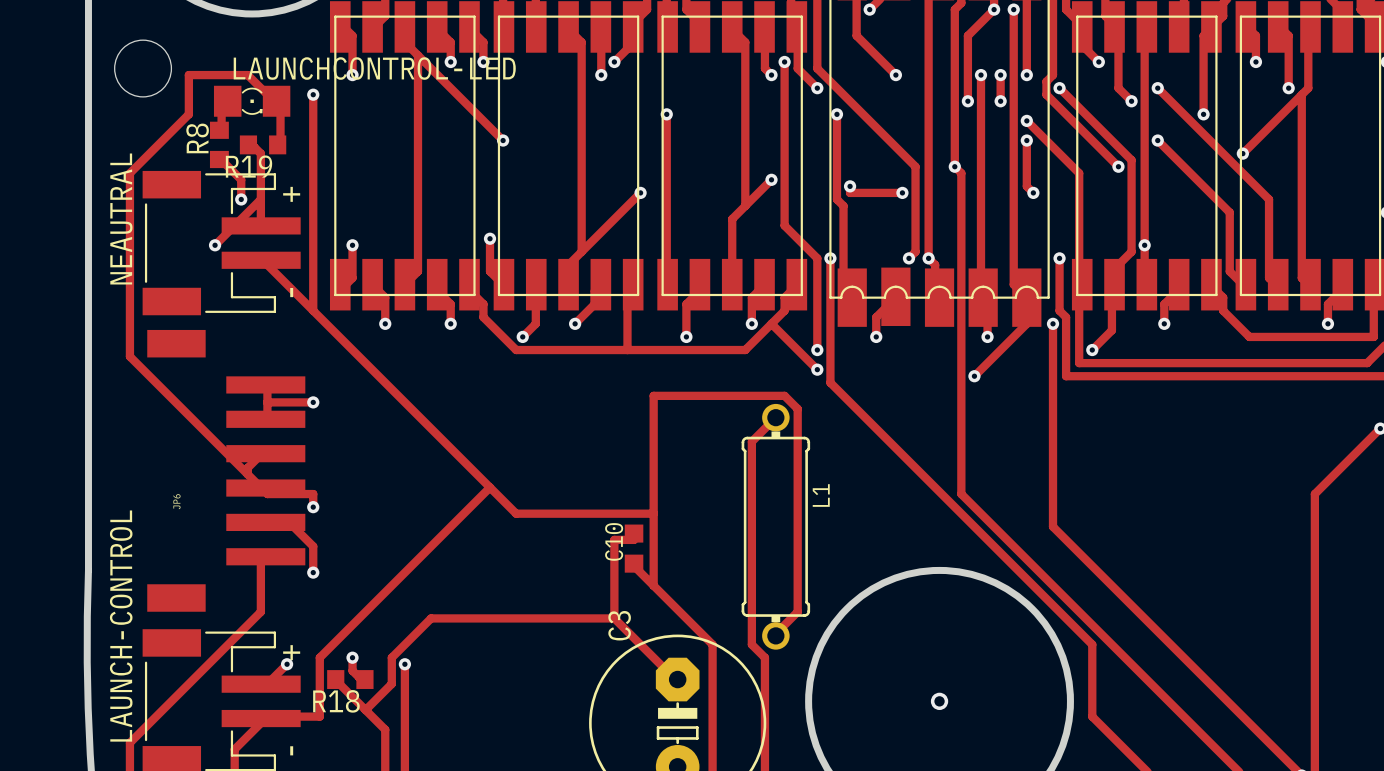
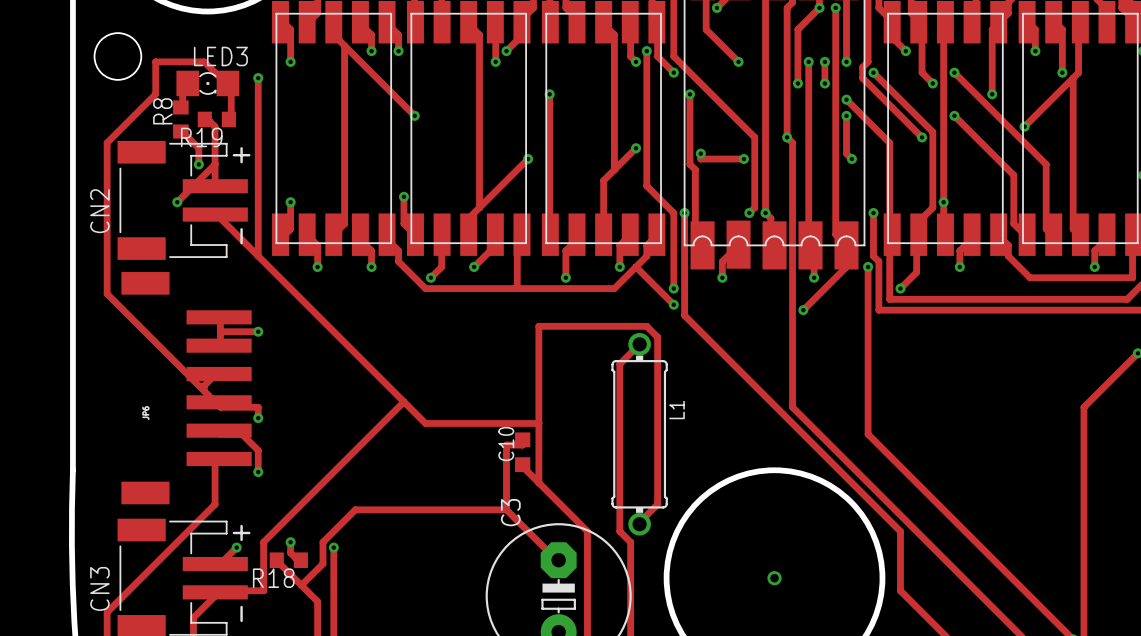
LAUNCHCONTROL-LED name: LAUNCHCONTROL-LED (374, 68) -> LED3 (220, 56)
NEAUTRAL name: NEAUTRAL (121, 219) -> CN2 (99, 211)
LAUNCH-CONTROL name: LAUNCH-CONTROL (121, 626) -> CN3 (99, 588)

